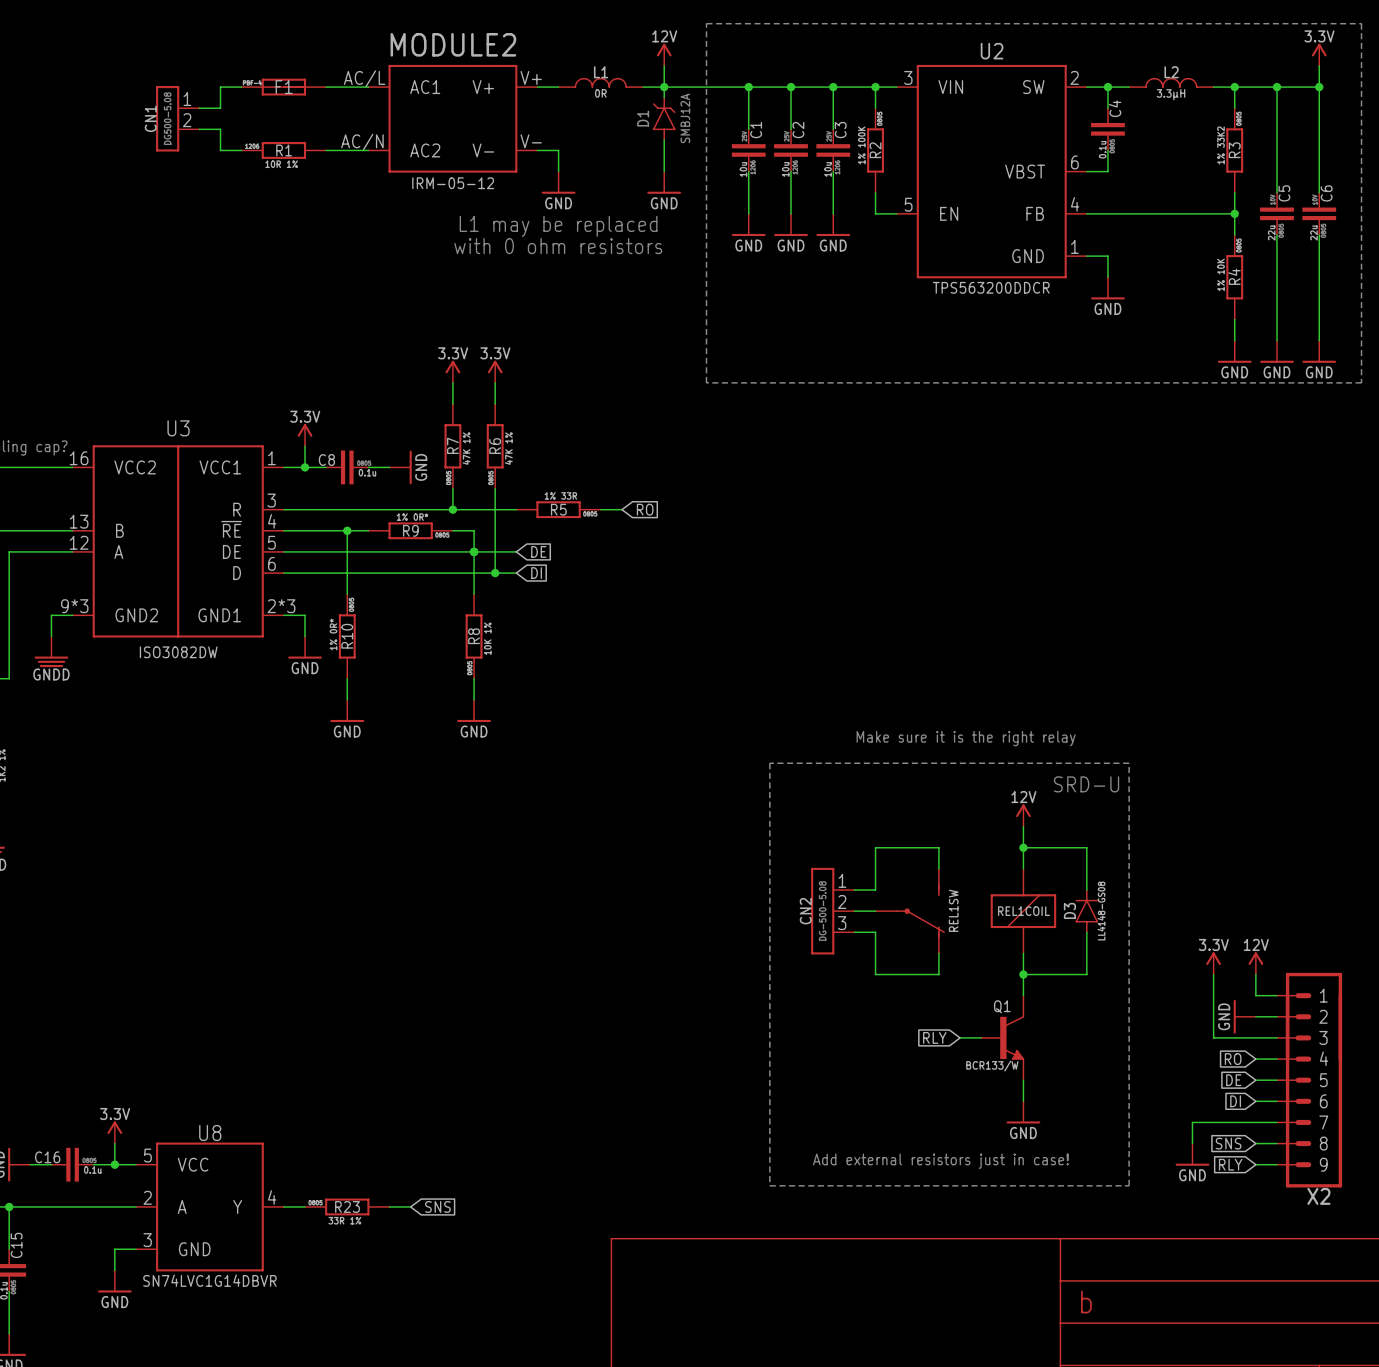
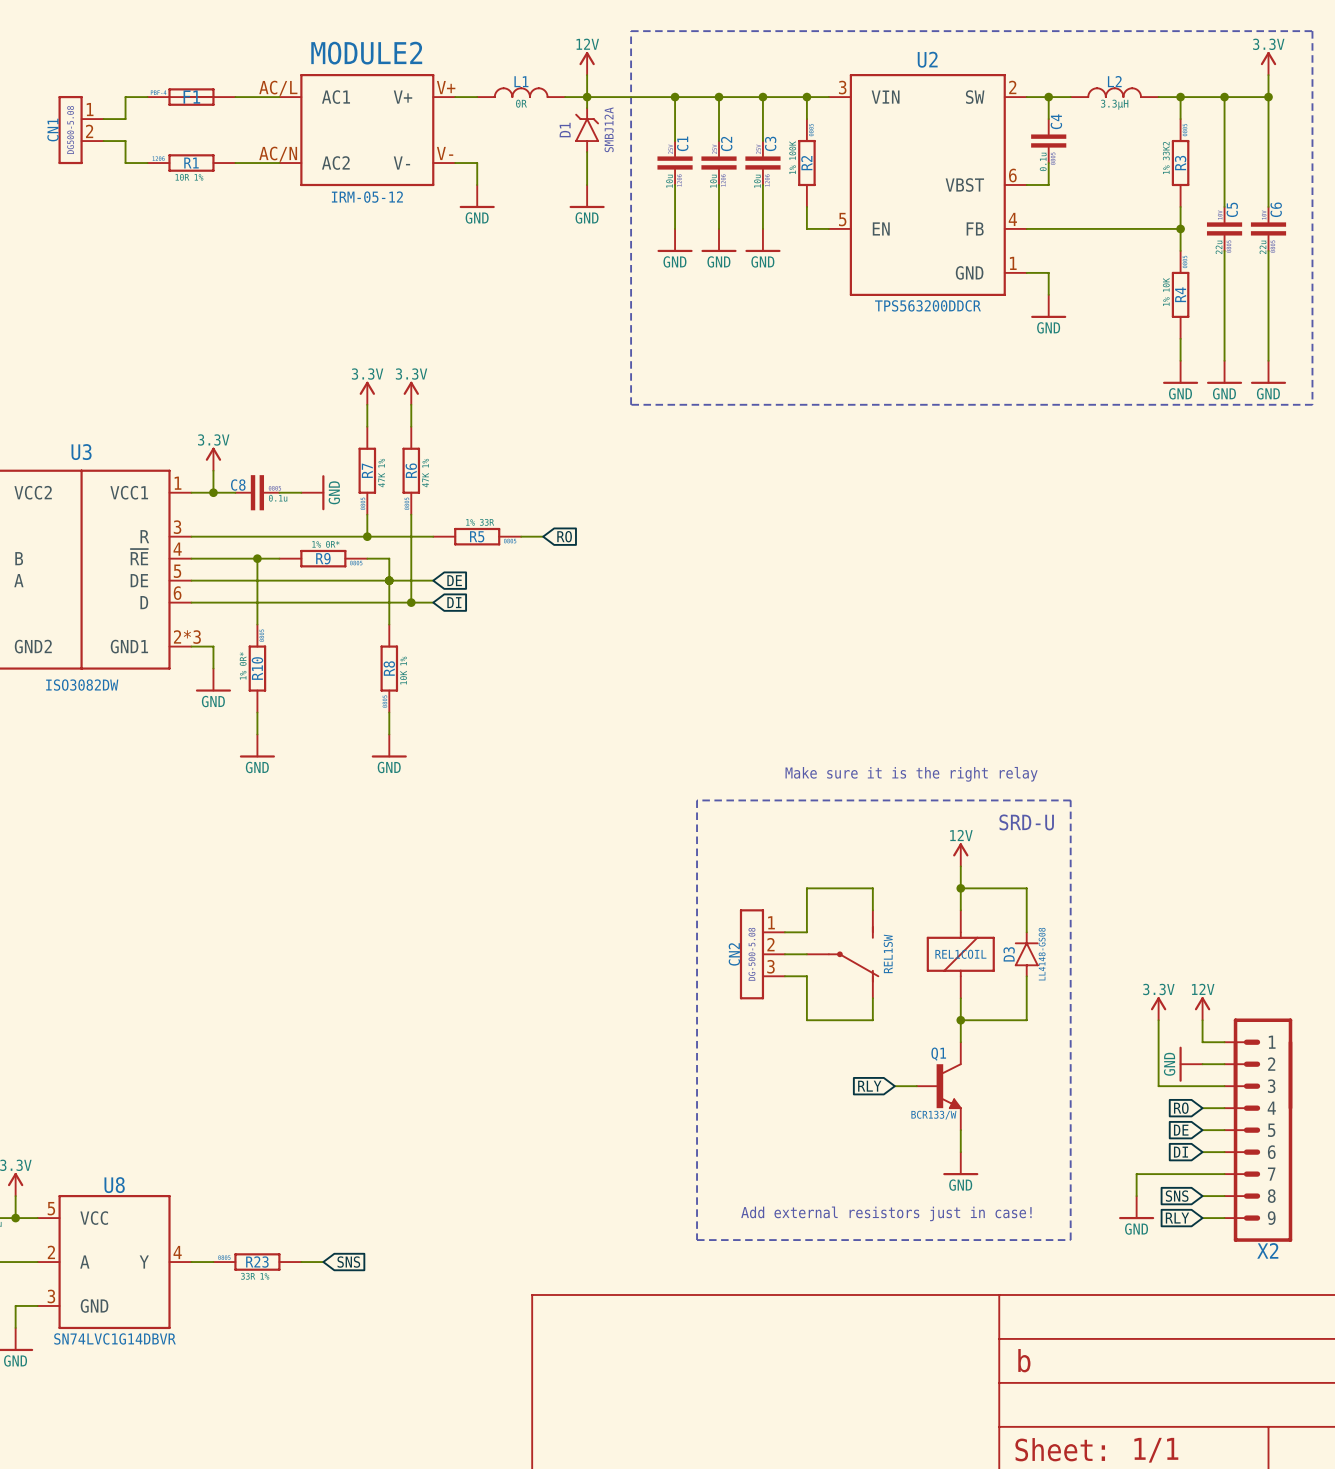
text: L1 may be replaced (558, 226) -> none
text: with 0 ohm resistors (558, 246) -> none

